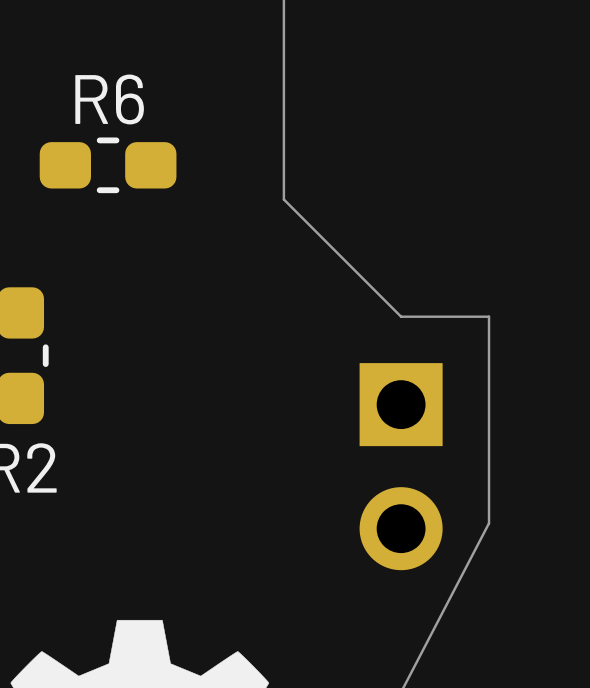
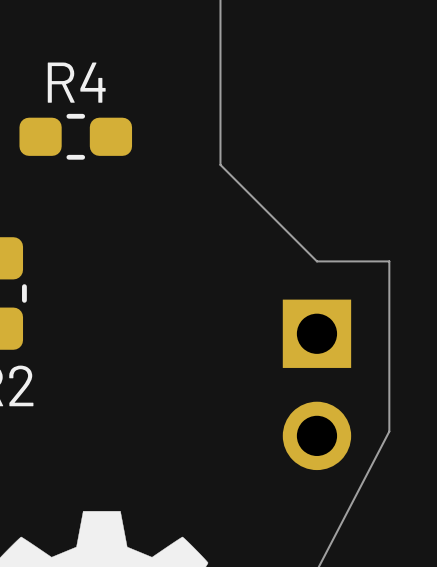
R6 name: R6 (109, 99) -> R4 (76, 82)

